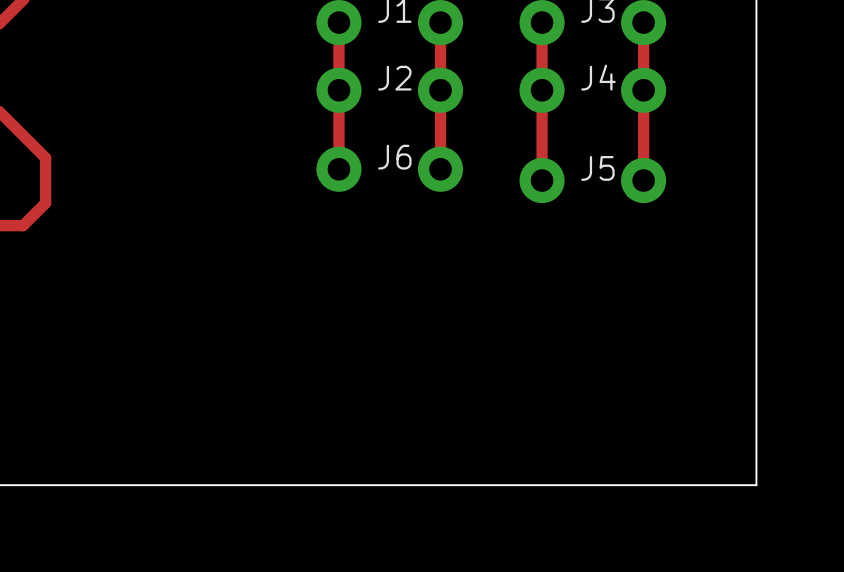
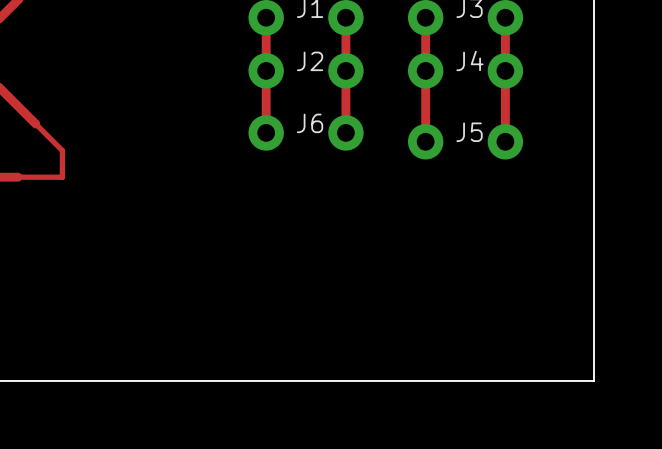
track: (45, 157) (45, 203) (23, 225) -> (35, 124) (62, 150) (62, 177) (18, 177)

